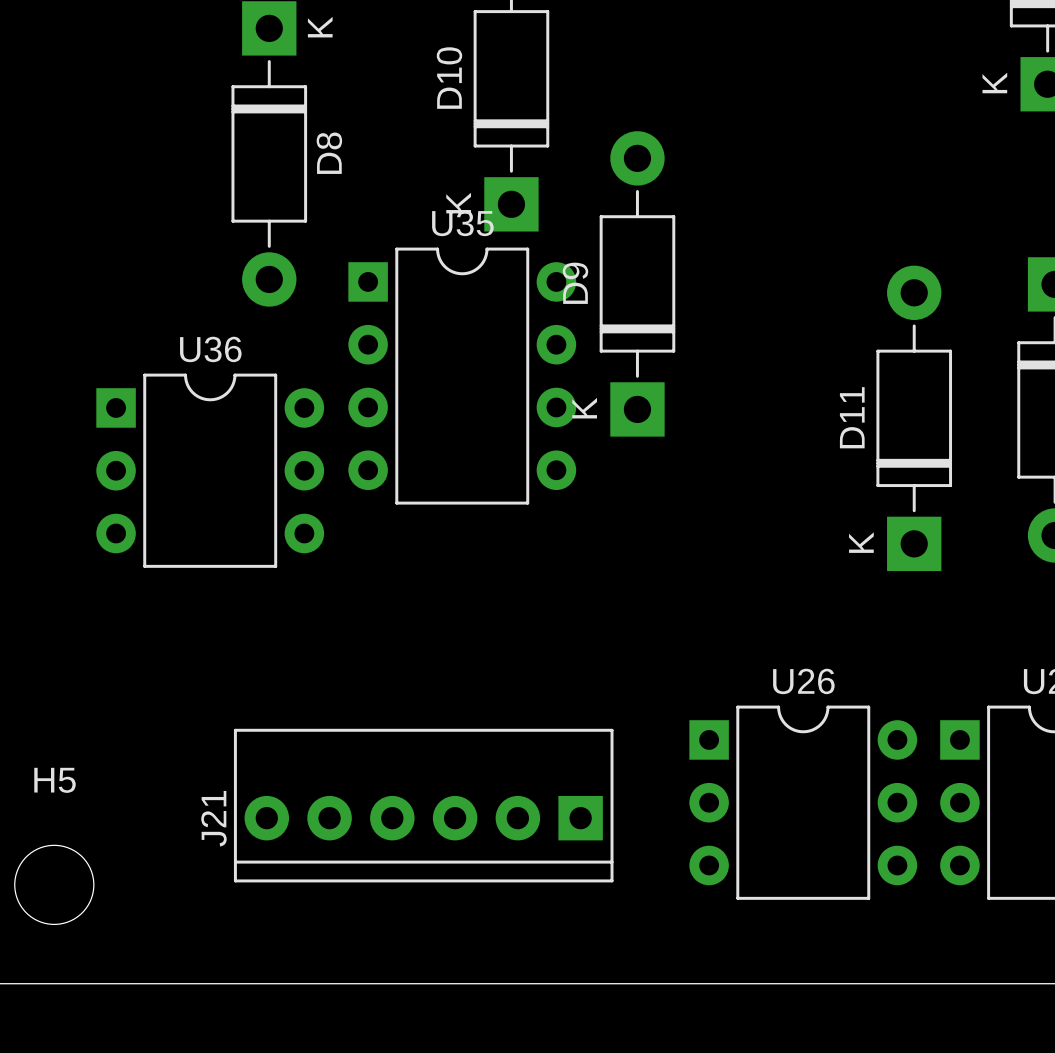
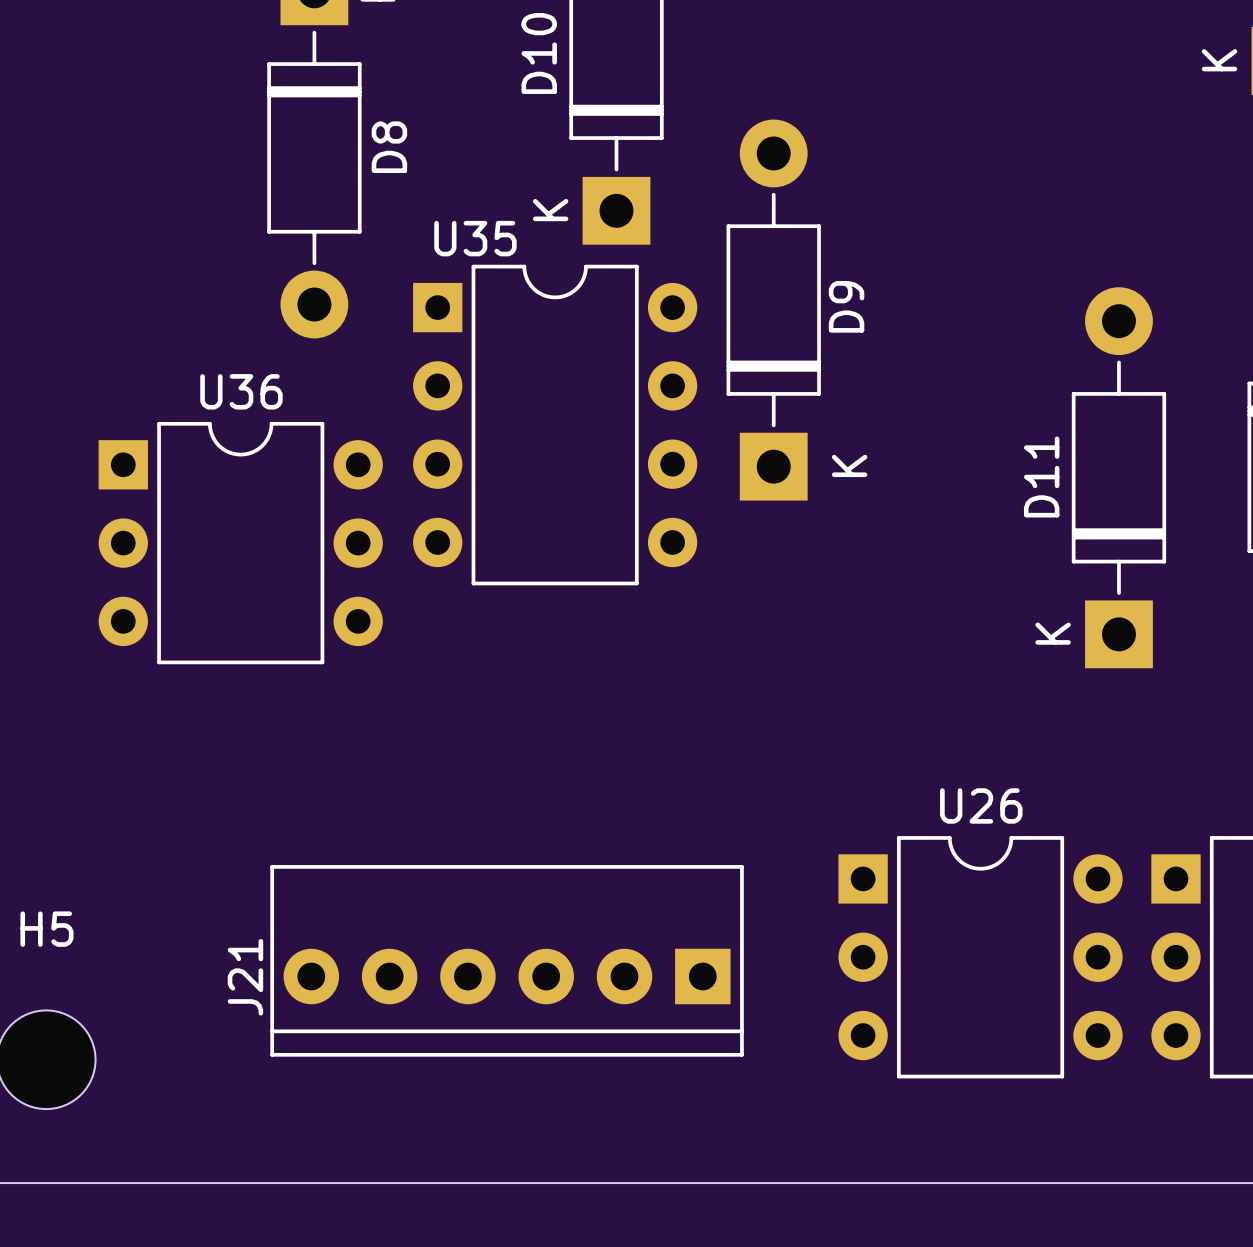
U35 name position: U35 (462, 223) -> U35 (475, 238)
D9 name position: D9 (575, 283) -> D9 (846, 306)
D9 text position: K (584, 408) -> K (849, 465)

